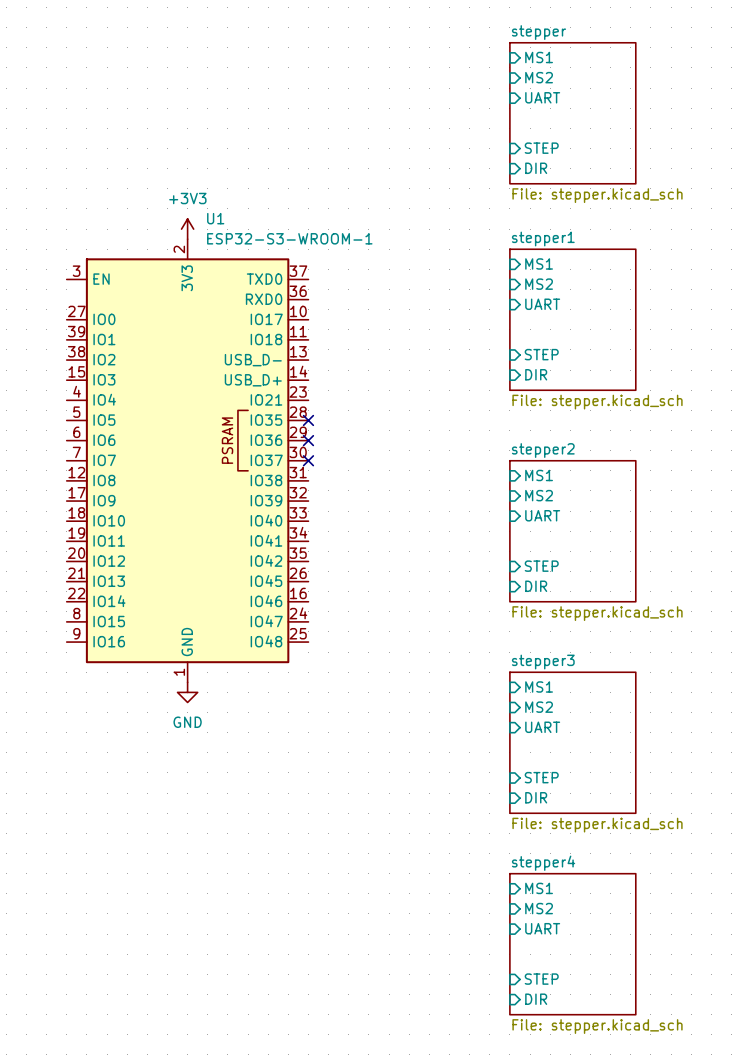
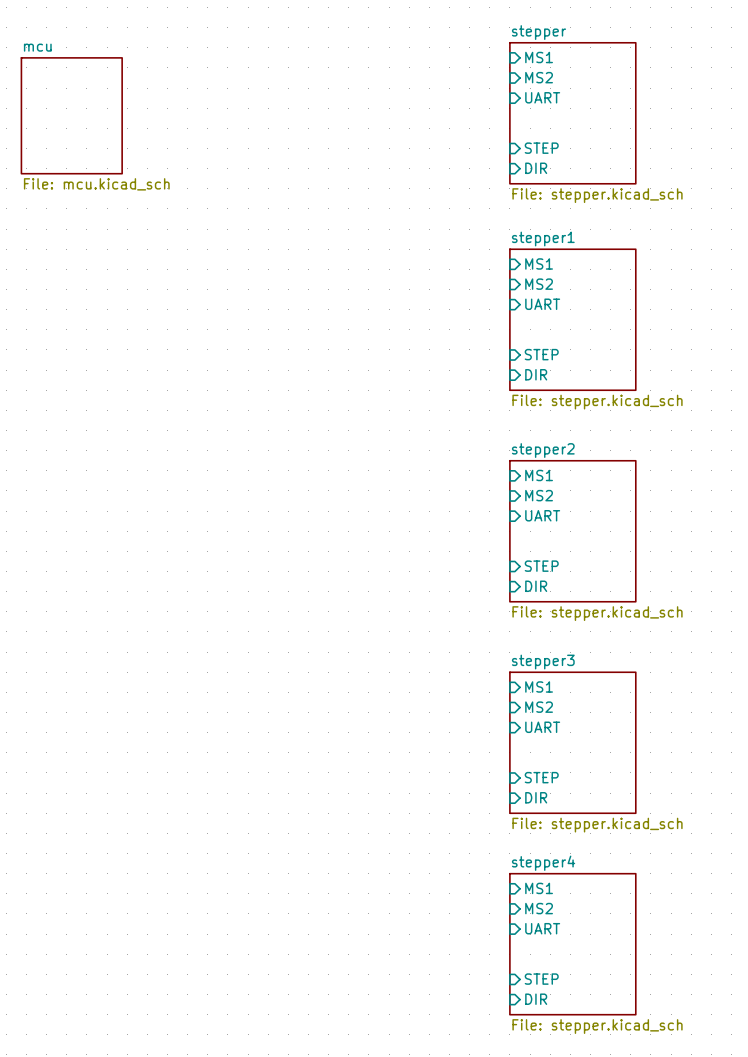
sheet mcu: none -> File: mcu.kicad_sch (71, 115)
power symbol: +3V3 (187, 229) -> none
no-connect mark: (308, 420) -> none
no-connect mark: (308, 440) -> none
U1: ESP32-S3-WROOM-1 (187, 460) -> none
no-connect mark: (308, 460) -> none
power symbol: GND (187, 692) -> none

